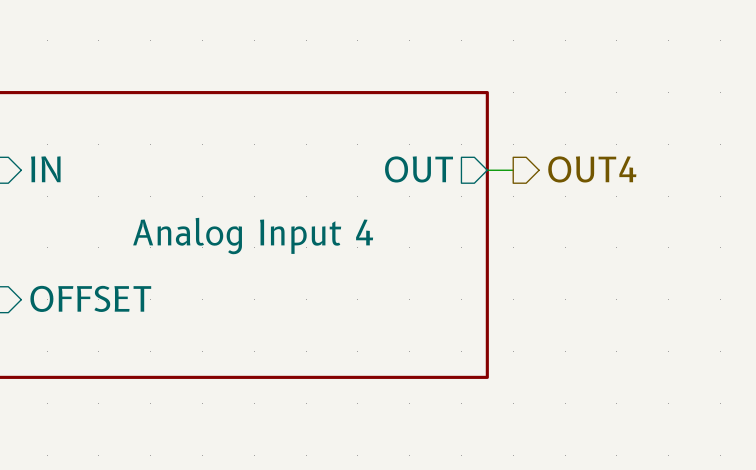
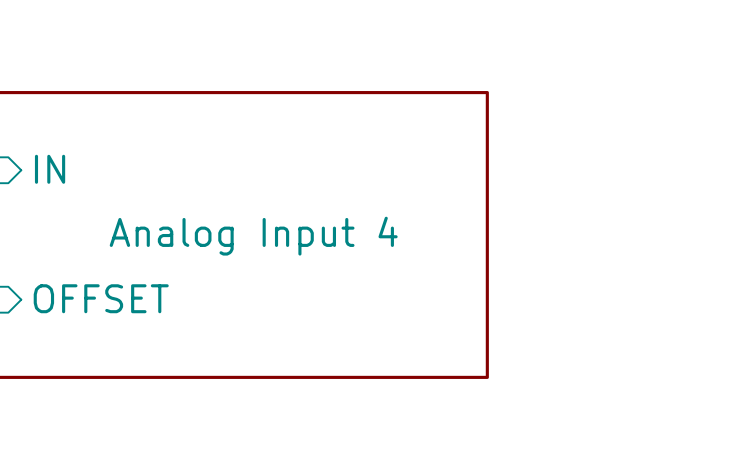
sheet pin: OUT (419, 169) -> none
hierarchical label: OUT4 (592, 169) -> none
wire: (487, 170) (513, 170) -> none

